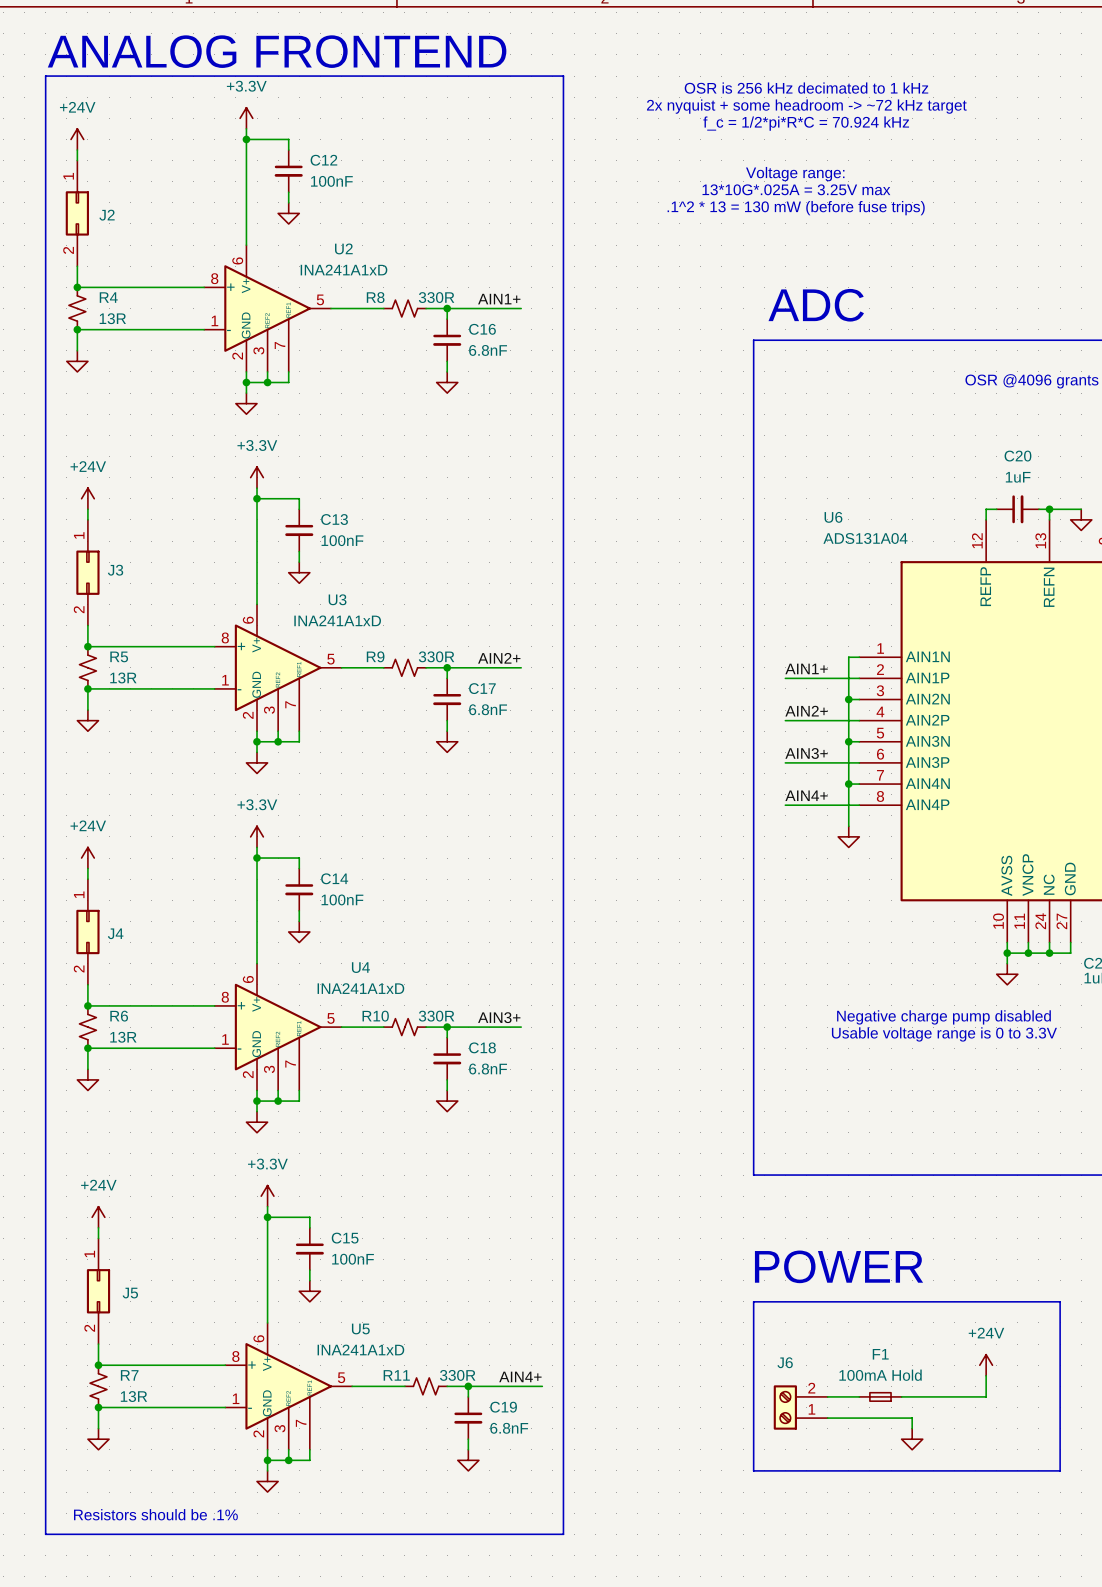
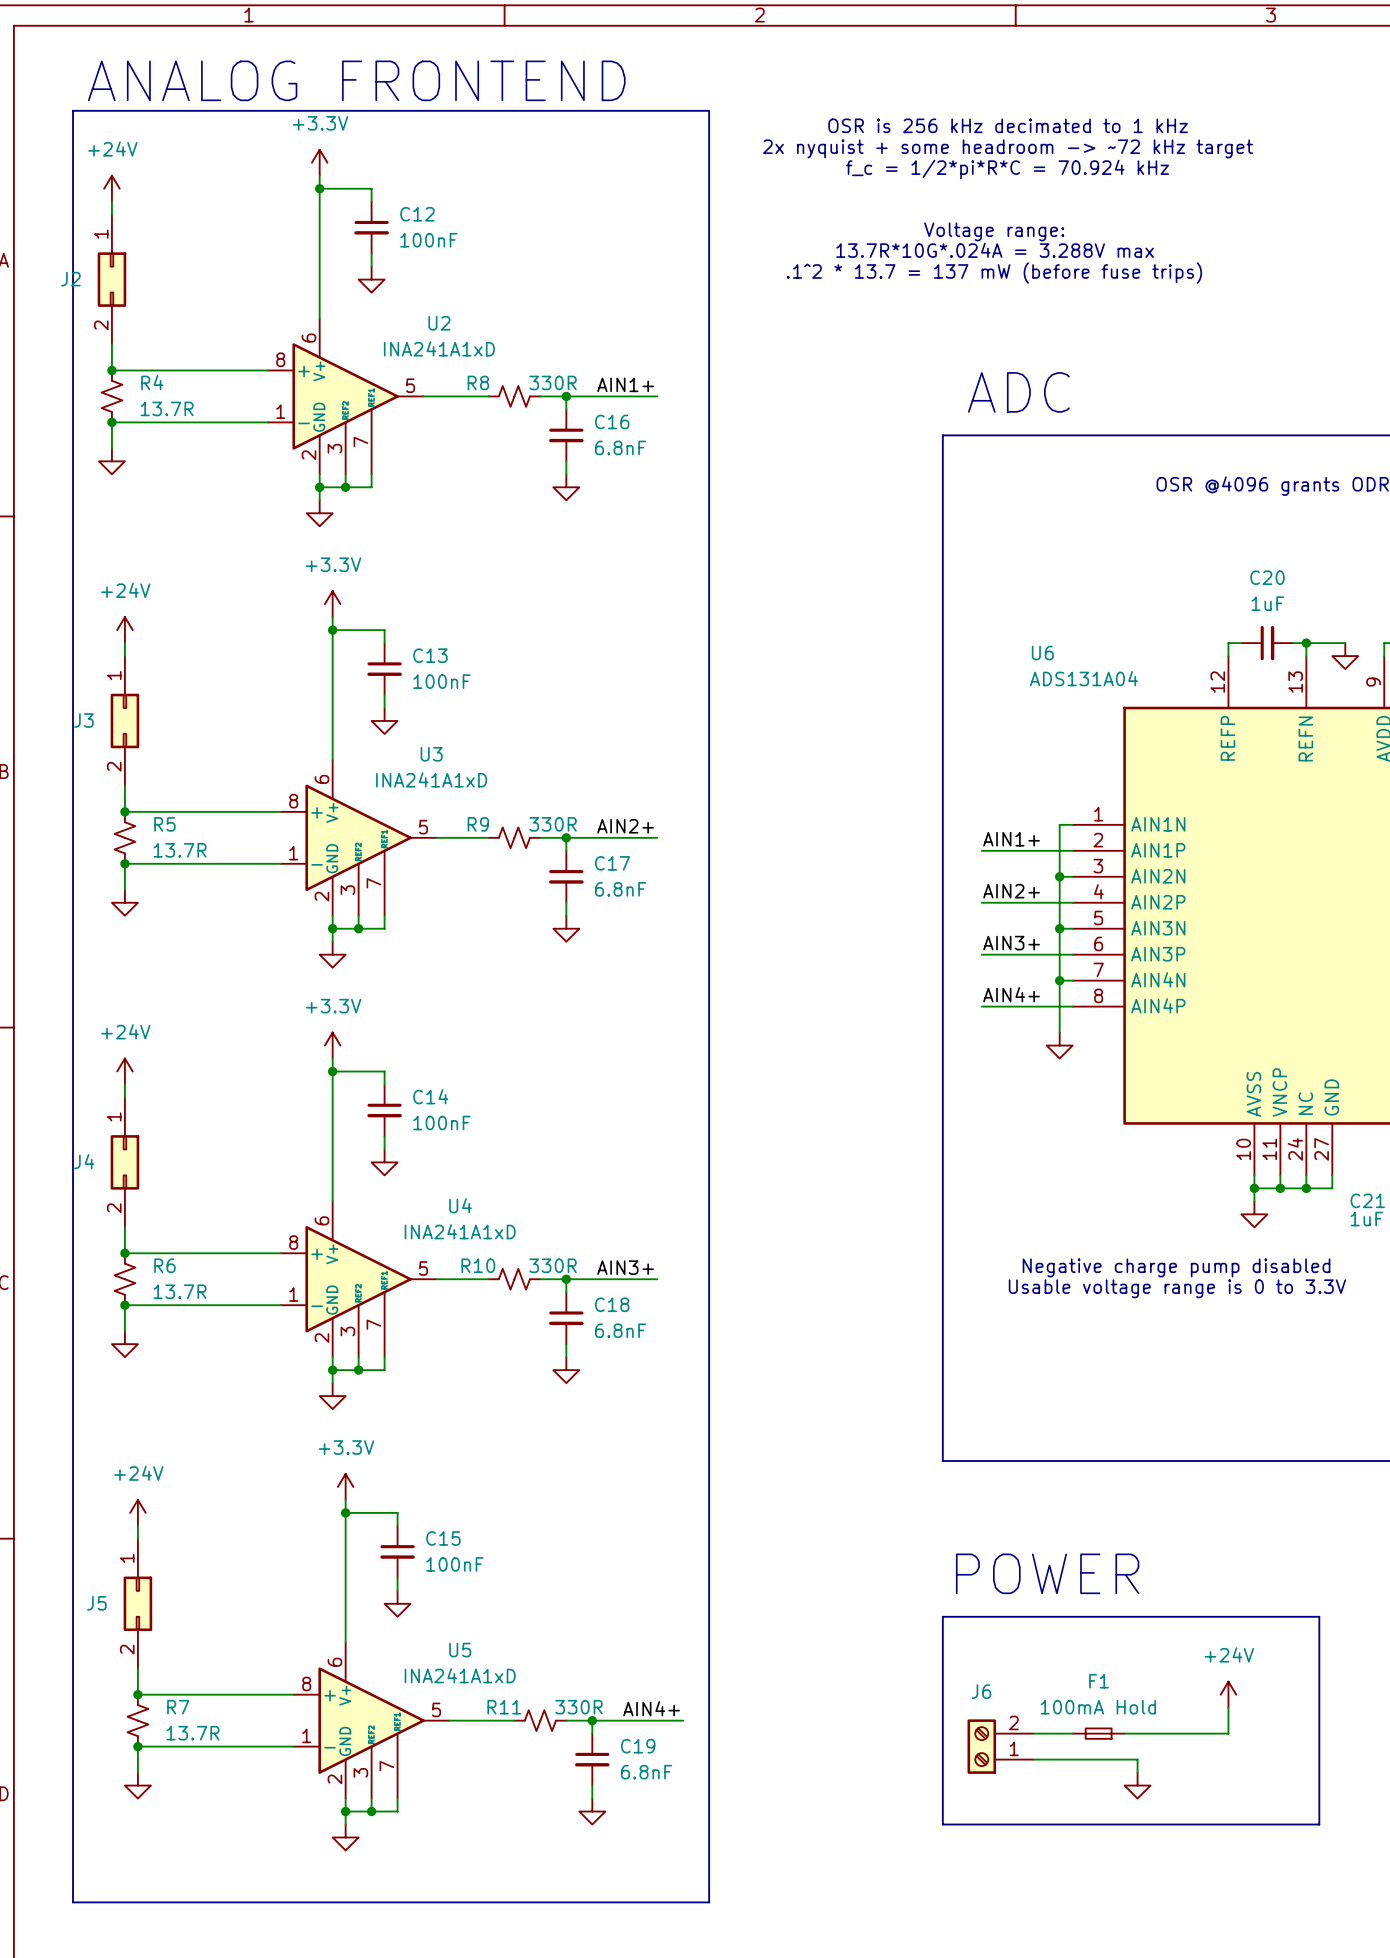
text: 13*10G*.025A = 3.25V max (796, 189) -> 13.7R*10G*.024A = 3.288V max (995, 250)
text: .1^2 * 13 = 130 mW (before fuse trips) (796, 208) -> .1^2 * 13.7 = 137 mW (before fuse trips) (994, 273)
J2 name position: J2 (107, 215) -> J2 (70, 279)
R4 value: 13R (112, 318) -> 13.7R (167, 408)
J3 name position: J3 (115, 570) -> J3 (83, 720)
R5 value: 13R (123, 677) -> 13.7R (180, 850)
J4 name position: J4 (115, 933) -> J4 (84, 1161)
R6 value: 13R (123, 1037) -> 13.7R (180, 1291)
J5 name position: J5 (130, 1293) -> J5 (96, 1603)
R7 value: 13R (133, 1396) -> 13.7R (193, 1733)
text: Resistors should be .1% (155, 1514) -> none

